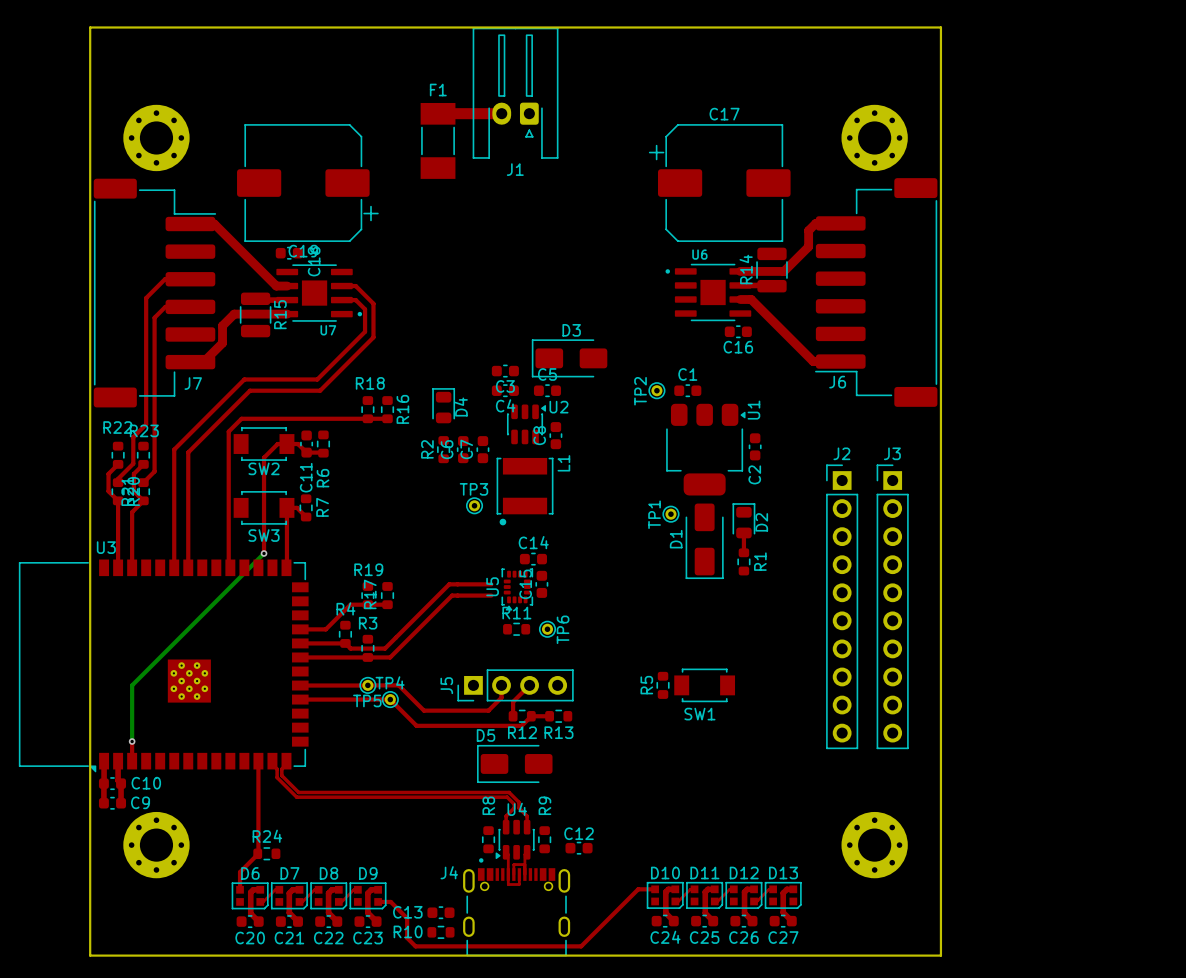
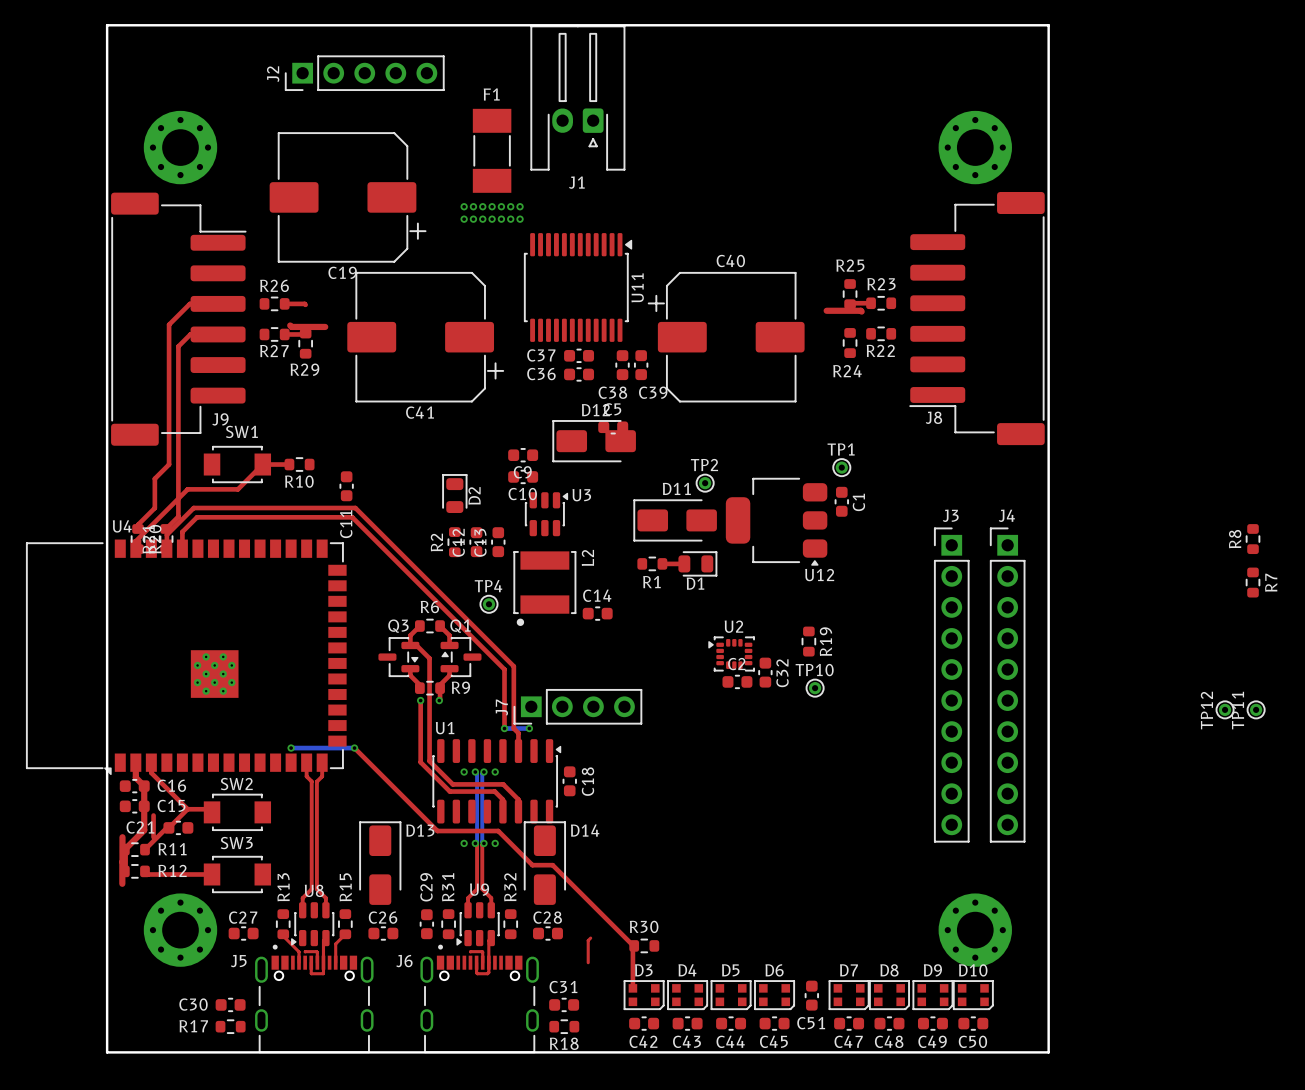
top track: (438, 113) (501, 113) -> none
C17: (719, 183) -> none
via: none -> (464, 206)
via: none -> (473, 206)
via: none -> (482, 206)
via: none -> (492, 206)
via: none -> (501, 206)
via: none -> (510, 206)
via: none -> (520, 206)
via: none -> (464, 219)
via: none -> (473, 219)
via: none -> (482, 219)
via: none -> (492, 219)
via: none -> (501, 219)
via: none -> (510, 219)
via: none -> (520, 219)
top track: (840, 223) (815, 223) (808, 230) (808, 246) (783, 271) (740, 271) -> none
top track: (190, 224) (214, 224) (276, 286) (287, 286) -> none
C18 rotation: 0° (289, 253) -> 90° clockwise (569, 781)
C18 position: (289, 253) -> (569, 781)
U11: none -> (578, 287)
R25: none -> (850, 294)
R14: (771, 270) -> none
top track: none -> (871, 303) (850, 304)
R26: none -> (274, 303)
top track: none -> (284, 303) (305, 304)
top track: (341, 286) (355, 286) (373, 303) (373, 337) (320, 390) (250, 390) (188, 452) (188, 567) -> none
R15 footprint: [239, 292, 272, 338] -> [338, 909, 353, 940]
U6: (708, 292) -> none
U7: (319, 293) -> none
top track: (740, 299) (751, 299) (813, 361) (840, 361) -> none
top track: (341, 300) (355, 300) (365, 309) (365, 331) (317, 379) (244, 379) (174, 449) (174, 567) -> none
R27: none -> (274, 334)
top track: none -> (305, 333) (284, 334)
C41: none -> (425, 337)
C40: none -> (726, 337)
R15 name position: R15 (280, 314) -> R15 (345, 887)
top track: (287, 314) (234, 314) (222, 325) (222, 343) (203, 362) (190, 362) -> none
R29: none -> (305, 343)
C37: none -> (579, 355)
C16 position: (738, 331) -> (134, 786)
C38: none -> (622, 365)
C39: none -> (641, 365)
D3 footprint: [531, 339, 608, 378] -> [623, 980, 665, 1010]
C36: none -> (579, 374)
C16 name position: C16 (738, 347) -> C16 (171, 785)
C3: (505, 371) -> none
J6 name: J6 (837, 382) -> J8 (933, 417)
J7 name: J7 (193, 383) -> J9 (220, 419)
R18 name position: R18 (370, 383) -> R18 (564, 1043)
D4 footprint: [432, 388, 455, 424] -> [667, 980, 708, 1010]
C4: (505, 390) -> none
TP2 position: (656, 390) -> (705, 483)
C1 rotation: 0° (687, 390) -> 90° clockwise (841, 501)
C1 position: (687, 390) -> (841, 501)
TP2 name rotation: 0° (640, 391) -> 90° clockwise (704, 465)
U1 footprint: [666, 403, 746, 496] -> [432, 739, 562, 824]
U2 footprint: [507, 404, 547, 445] -> [708, 636, 755, 672]
D4 name position: D4 (461, 407) -> D4 (687, 970)
U2 name position: U2 (558, 407) -> U2 (733, 626)
R18 rotation: 0° (367, 409) -> 90° clockwise (564, 1026)
R18 position: (367, 409) -> (564, 1026)
R16: (387, 409) -> none
U1 name position: U1 (753, 410) -> U1 (445, 728)
top track: (387, 418) (241, 418) (228, 431) (228, 566) (230, 567) -> none
top track: none -> (289, 464) (262, 464) (237, 489) (187, 489) (135, 541) (135, 548)
R22 name position: R22 (117, 427) -> R22 (880, 350)
C8: (555, 435) -> none
SW2 position: (264, 444) -> (237, 812)
R6 rotation: 0° (323, 444) -> 90° clockwise (429, 626)
R6 position: (323, 444) -> (429, 626)
C2 rotation: 0° (755, 446) -> 90° clockwise (737, 681)
C2 position: (755, 446) -> (737, 681)
R2 position: (443, 449) -> (454, 542)
C6: (463, 449) -> none
C7: (482, 449) -> none
top track: (323, 453) (306, 452) (298, 444) (277, 444) (264, 457) (264, 553) -> none
J2 name position: J2 (841, 453) -> J2 (273, 74)
R22 rotation: 0° (118, 455) -> 90° clockwise (881, 333)
R22 position: (118, 455) -> (881, 333)
R23 rotation: 0° (143, 455) -> 90° clockwise (881, 303)
R23 position: (143, 455) -> (881, 303)
top track: (118, 464) (108, 473) (108, 491) (118, 500) (118, 567) -> none
top track: (143, 464) (133, 473) (133, 491) (143, 500) (132, 512) (132, 567) -> none
J2 footprint: [826, 464, 859, 750] -> [285, 55, 445, 91]
SW2 name position: SW2 (264, 468) -> SW2 (236, 784)
C2 name position: C2 (754, 474) -> C2 (736, 664)
U12: none -> (776, 521)
R6 name position: R6 (323, 478) -> R6 (429, 607)
L1: (525, 491) -> none
top track: none -> (166, 548) (166, 534) (193, 508) (355, 508) (513, 666) (513, 728) (518, 733) (518, 751)
top track: none -> (182, 548) (182, 531) (197, 517) (352, 517) (504, 669) (504, 728)
D1 footprint: [685, 503, 724, 579] -> [678, 551, 718, 577]
TP3: (474, 505) -> none
SW3 position: (264, 507) -> (237, 874)
R7 position: (306, 507) -> (1253, 582)
top track: none -> (662, 563) (684, 563)
TP1 name rotation: 0° (654, 514) -> 90° clockwise (841, 449)
TP1 position: (670, 514) -> (841, 467)
top track: (306, 517) (297, 507) (286, 507) (286, 567) -> none
D2 position: (743, 520) -> (454, 493)
top track: (743, 532) (743, 552) -> none
SW3 name position: SW3 (264, 535) -> SW3 (236, 843)
L2: none -> (544, 588)
D1 name position: D1 (676, 539) -> D1 (695, 583)
U3 name position: U3 (106, 547) -> U3 (581, 495)
bottom track: (264, 553) (132, 685) (132, 741) -> none
via: (264, 553) -> none
U3 footprint: [18, 559, 309, 773] -> [525, 492, 569, 537]
R1 rotation: 0° (743, 561) -> 90° clockwise (652, 563)
R1 position: (743, 561) -> (652, 563)
R19 name rotation: 0° (368, 569) -> 90° counterclockwise (825, 641)
top track: none -> (419, 626) (410, 635) (410, 645) (416, 645) (429, 658) (429, 761) (452, 784) (503, 784) (518, 799) (518, 811)
top track: none -> (440, 626) (449, 635) (449, 645)
top track: (491, 584) (449, 584) (385, 648) (350, 648) (345, 643) (300, 643) -> none
C15 name position: C15 (525, 584) -> C15 (171, 805)
C15 rotation: 0° (541, 584) -> 90° clockwise (134, 806)
C15 position: (541, 584) -> (134, 806)
U5: (517, 589) -> none
R19 position: (367, 595) -> (808, 641)
R17 rotation: 0° (387, 595) -> 90° clockwise (230, 1026)
R17 position: (387, 595) -> (230, 1026)
top track: (491, 595) (452, 595) (390, 657) (300, 657) -> none
Q3: none -> (398, 657)
Q1: none -> (461, 657)
top track: (387, 604) (350, 604) (325, 629) (300, 629) -> none
J3 position: (892, 606) -> (951, 685)
top track: none -> (410, 668) (410, 675) (419, 685) (419, 688)
top track: none -> (449, 668) (449, 675) (440, 685) (439, 700)
C32: none -> (765, 672)
R11 name position: R11 (516, 613) -> R11 (172, 849)
TP10: none -> (815, 688)
R11 position: (516, 629) -> (134, 849)
TP6: (547, 629) -> none
R4: (345, 634) -> none
top track: none -> (420, 700) (420, 762) (449, 791) (494, 791) (502, 799) (502, 811)
via: none -> (420, 700)
via: none -> (439, 700)
J7: none -> (577, 706)
TP12: none -> (1225, 709)
TP11: none -> (1256, 709)
R3: (367, 648) -> none
bottom track: none -> (504, 728) (529, 728)
via: none -> (504, 728)
via: none -> (529, 728)
J5 footprint: [457, 669, 574, 702] -> [255, 944, 374, 1054]
bottom track: none -> (291, 748) (354, 748)
via: none -> (291, 748)
top track: none -> (354, 748) (437, 831) (498, 831) (532, 865) (552, 865) (632, 945) (632, 988)
via: none -> (354, 748)
top track: (300, 685) (367, 685) -> none
top track: (367, 685) (398, 685) (424, 710) (488, 710) (501, 697) (501, 685) -> none
TP5: (367, 685) -> none
J5 name position: J5 (446, 685) -> J5 (238, 961)
top track: (529, 685) (513, 701) (513, 716) -> none
R5: (663, 685) -> none
SW1 position: (704, 685) -> (237, 464)
top track: none -> (135, 762) (135, 777) (144, 786) (144, 830) (124, 849) (124, 871)
top track: none -> (151, 762) (151, 772) (187, 809)
top track: none -> (306, 762) (306, 776) (311, 781) (311, 889) (302, 898) (302, 910)
top track: none -> (322, 762) (322, 776) (316, 781) (316, 889) (325, 898) (325, 910)
top track: (300, 699) (390, 699) (416, 725) (521, 725) (531, 716) (549, 716) -> none
TP4 position: (390, 699) -> (488, 604)
via: none -> (464, 772)
bottom track: none -> (475, 772) (477, 773) (477, 841) (475, 843)
via: none -> (475, 772)
bottom track: none -> (483, 772) (482, 773) (482, 841) (483, 843)
via: none -> (483, 772)
via: none -> (495, 772)
SW1 name position: SW1 (699, 714) -> SW1 (241, 431)
R12 position: (522, 716) -> (134, 871)
R13 rotation: 0° (558, 716) -> 90° clockwise (283, 924)
R13 position: (558, 716) -> (283, 924)
R12 name position: R12 (522, 732) -> R12 (172, 870)
R13 name position: R13 (558, 732) -> R13 (283, 887)
D5 name position: D5 (486, 735) -> D5 (730, 970)
top track: none -> (212, 812) (208, 809) (187, 809) (145, 849)
via: (132, 741) -> none
D5 footprint: [477, 745, 553, 783] -> [710, 980, 752, 1010]
top track: (118, 761) (121, 803) -> none
top track: (258, 761) (258, 853) (240, 872) (240, 889) -> none
top track: (272, 761) (272, 764) (277, 769) (277, 777) (296, 797) (507, 797) (514, 804) (514, 808) (506, 816) (506, 827) -> none
top track: (286, 761) (286, 764) (281, 769) (281, 775) (298, 792) (509, 792) (518, 802) (518, 808) (527, 816) (527, 827) -> none
via: none -> (464, 843)
top track: none -> (475, 843) (477, 845) (477, 889) (468, 898) (468, 910)
via: none -> (475, 843)
top track: none -> (483, 843) (482, 845) (482, 889) (491, 898) (491, 910)
via: none -> (483, 843)
via: none -> (495, 843)
C10 position: (112, 783) -> (523, 476)
C10 name position: C10 (146, 783) -> C10 (522, 494)
D14: none -> (544, 863)
top track: none -> (145, 871) (148, 874) (212, 874)
C9 name position: C9 (140, 802) -> C9 (522, 472)
C9 position: (112, 803) -> (523, 455)
R8 name position: R8 (488, 805) -> R8 (1235, 539)
U4 name position: U4 (517, 809) -> U4 (122, 526)
U4 footprint: [495, 819, 535, 860] -> [26, 539, 347, 776]
R24 name position: R24 (267, 836) -> R24 (847, 371)
U8: none -> (312, 924)
C29: none -> (426, 924)
R31: none -> (448, 924)
U9: none -> (477, 924)
R32: none -> (510, 924)
R8 position: (488, 839) -> (1253, 539)
R9 rotation: 0° (544, 839) -> 90° clockwise (429, 688)
R9 position: (544, 839) -> (429, 688)
top track: none -> (283, 934) (299, 951) (299, 962)
top track: none -> (345, 934) (335, 943) (335, 962)
C28: none -> (547, 933)
C12 rotation: 0° (579, 848) -> 90° clockwise (476, 542)
C12 position: (579, 848) -> (476, 542)
top track: none -> (325, 938) (323, 940) (323, 973) (311, 973) (311, 962)
top track: none -> (491, 938) (488, 940) (488, 972) (477, 973) (476, 962)
top track: (506, 852) (508, 854) (508, 884) (519, 884) (519, 874) -> none
R24 rotation: 0° (266, 853) -> 90° clockwise (850, 343)
R24 position: (266, 853) -> (850, 343)
J4 footprint: [463, 858, 571, 957] -> [990, 527, 1026, 843]
R30: none -> (644, 945)
top track: none -> (305, 951) (316, 951) (317, 962)
top track: none -> (470, 951) (482, 951) (482, 962)
top track: (524, 864) (514, 864) (513, 874) -> none
J4 name position: J4 (449, 872) -> J4 (1006, 515)
D13 name position: D13 (783, 873) -> D13 (420, 830)
D11 footprint: [686, 882, 723, 909] -> [633, 499, 717, 542]
D12 footprint: [725, 882, 763, 909] -> [552, 420, 636, 463]
D13 footprint: [764, 882, 802, 909] -> [359, 821, 402, 905]
top track: (260, 889) (253, 889) (250, 892) (250, 913) (258, 921) -> none
top track: (279, 889) (275, 889) (263, 901) (260, 901) -> none
top track: (299, 889) (292, 889) (289, 893) (289, 912) (298, 921) -> none
top track: (318, 889) (314, 889) (302, 901) (299, 901) -> none
top track: (338, 889) (332, 889) (328, 893) (328, 912) (337, 921) -> none
top track: (357, 889) (353, 889) (341, 901) (338, 901) -> none
top track: (378, 889) (371, 889) (367, 893) (367, 912) (376, 921) -> none
top track: (655, 889) (638, 889) (581, 946) (415, 946) (407, 937) (407, 918) (390, 901) (378, 901) -> none
top track: (675, 889) (668, 889) (665, 891) (665, 913) (673, 921) -> none
top track: (694, 889) (690, 889) (678, 901) (675, 901) -> none
top track: (714, 889) (707, 889) (705, 891) (705, 913) (713, 921) -> none
top track: (733, 889) (729, 889) (717, 901) (714, 901) -> none
top track: (754, 889) (747, 889) (744, 891) (744, 913) (752, 921) -> none
top track: (773, 889) (769, 889) (756, 901) (754, 901) -> none
top track: (793, 889) (786, 889) (783, 893) (783, 912) (791, 921) -> none
D6 position: (250, 895) -> (774, 995)
D7 position: (289, 895) -> (849, 995)
D8 position: (328, 895) -> (889, 995)
D9 position: (368, 895) -> (932, 995)
D10 position: (665, 895) -> (973, 995)
C51: none -> (811, 995)
J6: none -> (479, 998)
C30: none -> (230, 1004)
C13 rotation: 0° (440, 912) -> 90° clockwise (498, 542)
C13 position: (440, 912) -> (498, 542)
C31: none -> (564, 1004)
C20: (250, 921) -> none
C21 position: (289, 921) -> (178, 827)
C22: (328, 921) -> none
C23: (368, 921) -> none
C24: (665, 921) -> none
C25: (704, 921) -> none
C26 position: (743, 921) -> (383, 933)
C27 position: (783, 921) -> (243, 933)
C42: none -> (644, 1023)
C43: none -> (687, 1023)
C44: none -> (731, 1023)
C45: none -> (774, 1023)
C47: none -> (849, 1023)
C48: none -> (889, 1023)
C49: none -> (932, 1023)
C50: none -> (973, 1023)
R10 name position: R10 (408, 931) -> R10 (299, 481)
R10 position: (440, 932) -> (299, 464)
C26 name position: C26 (743, 937) -> C26 (383, 917)
C27 name position: C27 (783, 937) -> C27 (243, 917)
C21 name position: C21 (289, 938) -> C21 (140, 827)

